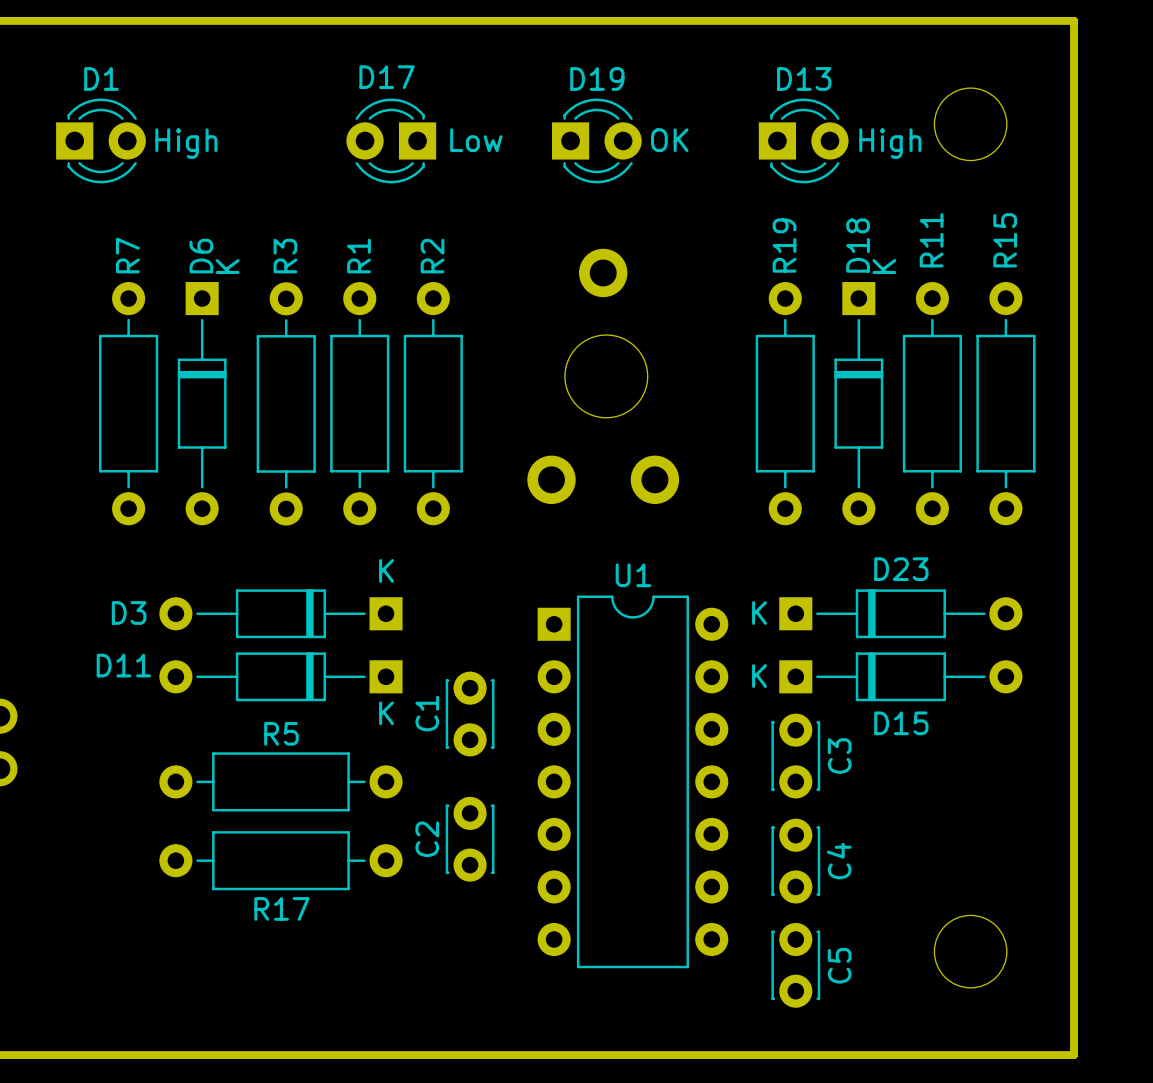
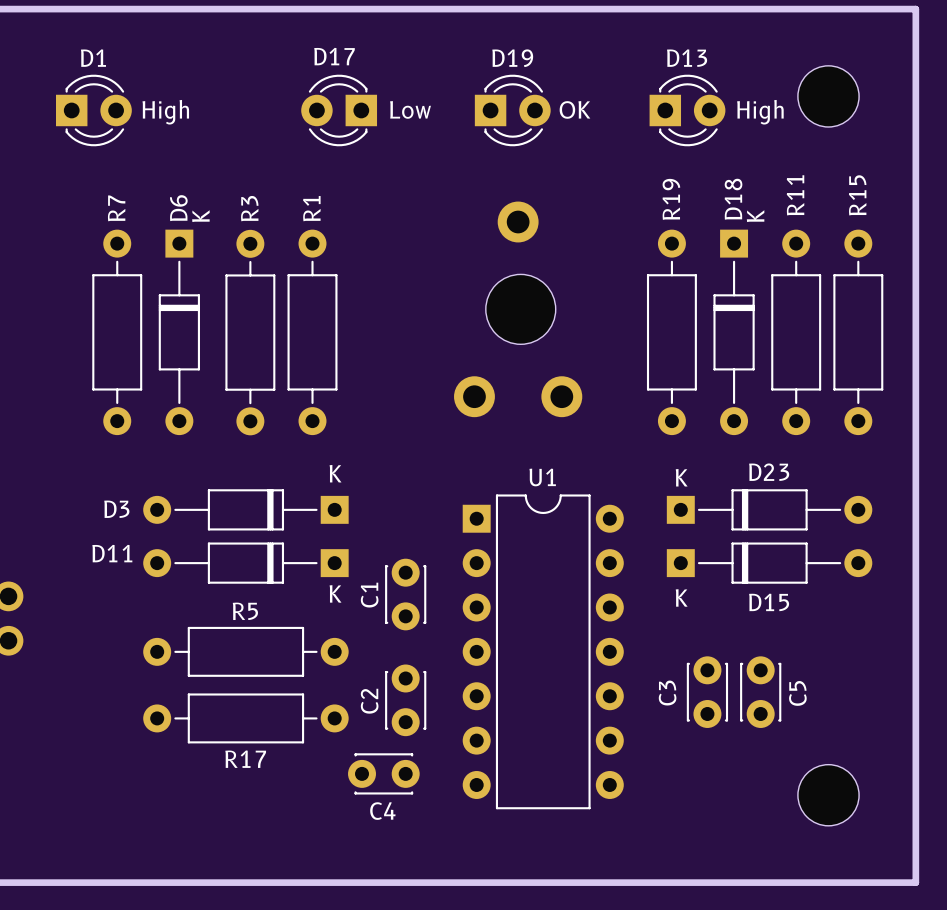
R2: (433, 403) -> none
D23 text position: K (759, 613) -> K (681, 477)
D15 text position: K (759, 676) -> K (681, 597)
C3 position: (795, 756) -> (707, 692)
C3 name position: C3 (839, 756) -> C3 (667, 693)
C4 rotation: 0° (795, 861) -> 90° clockwise (383, 773)
C4 position: (795, 861) -> (383, 773)
C5 position: (795, 965) -> (760, 692)

